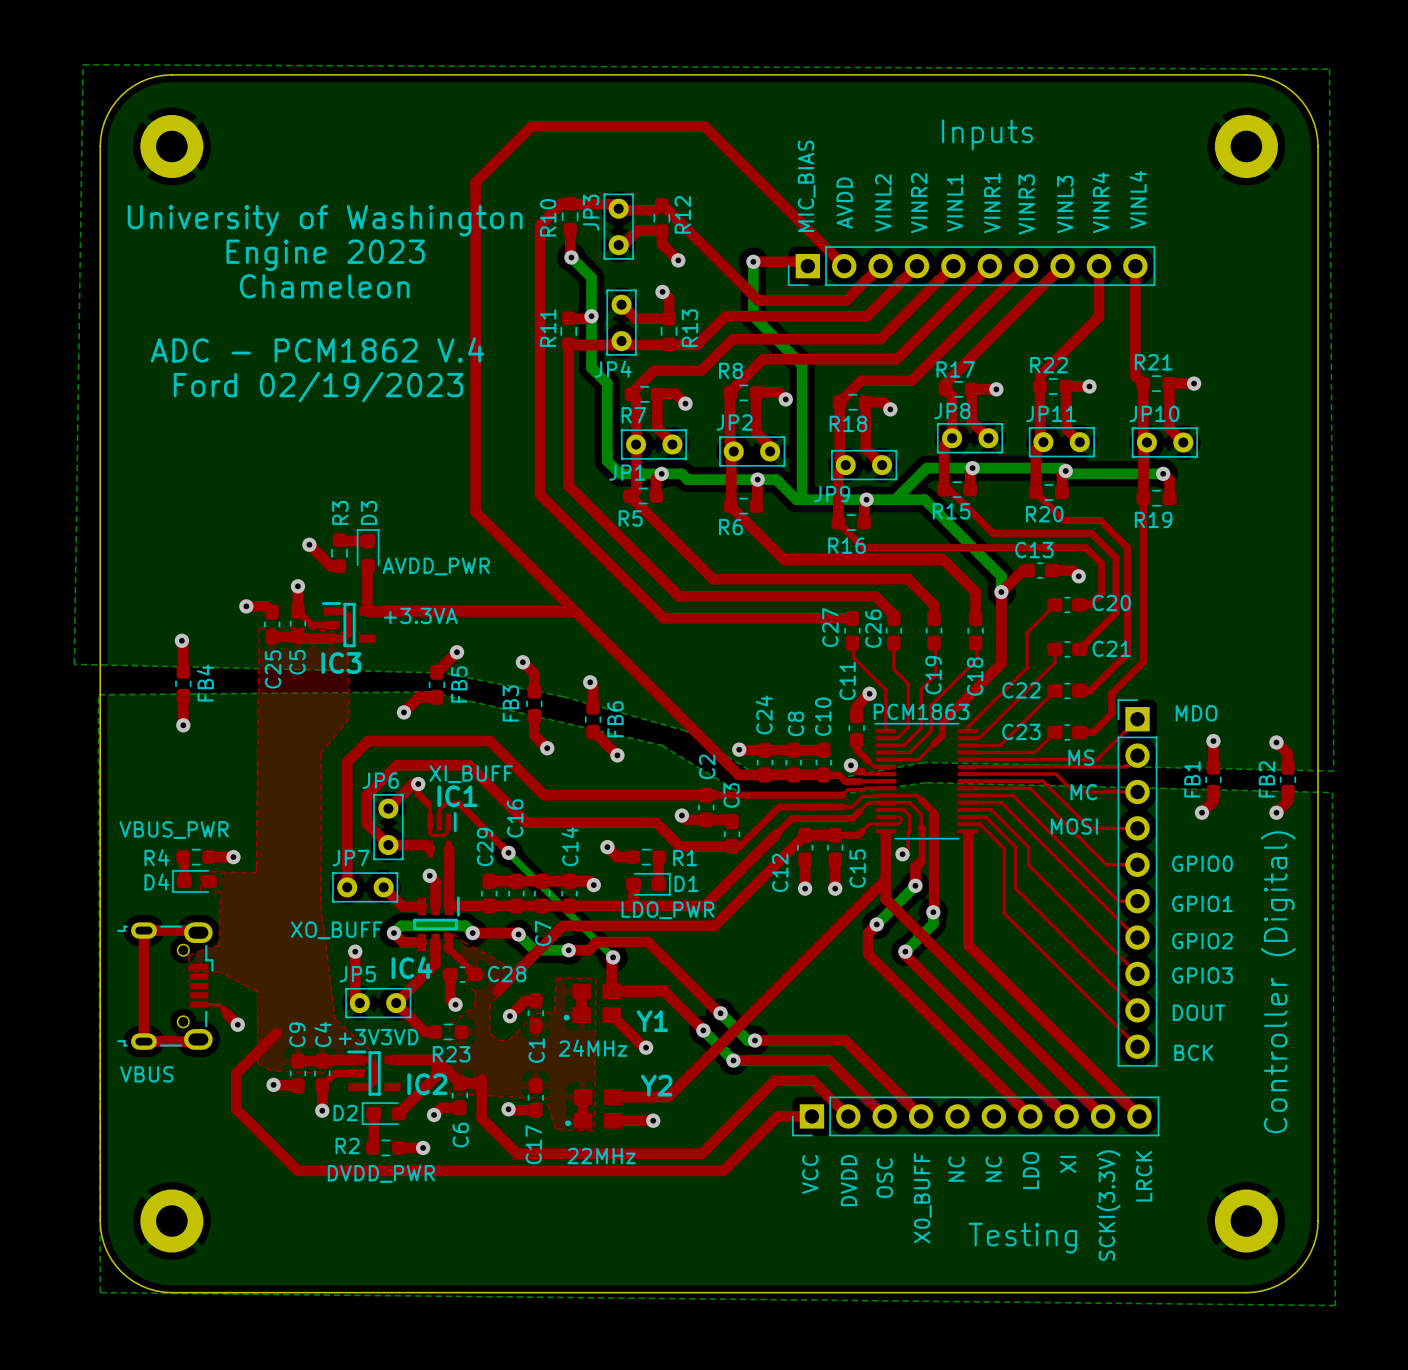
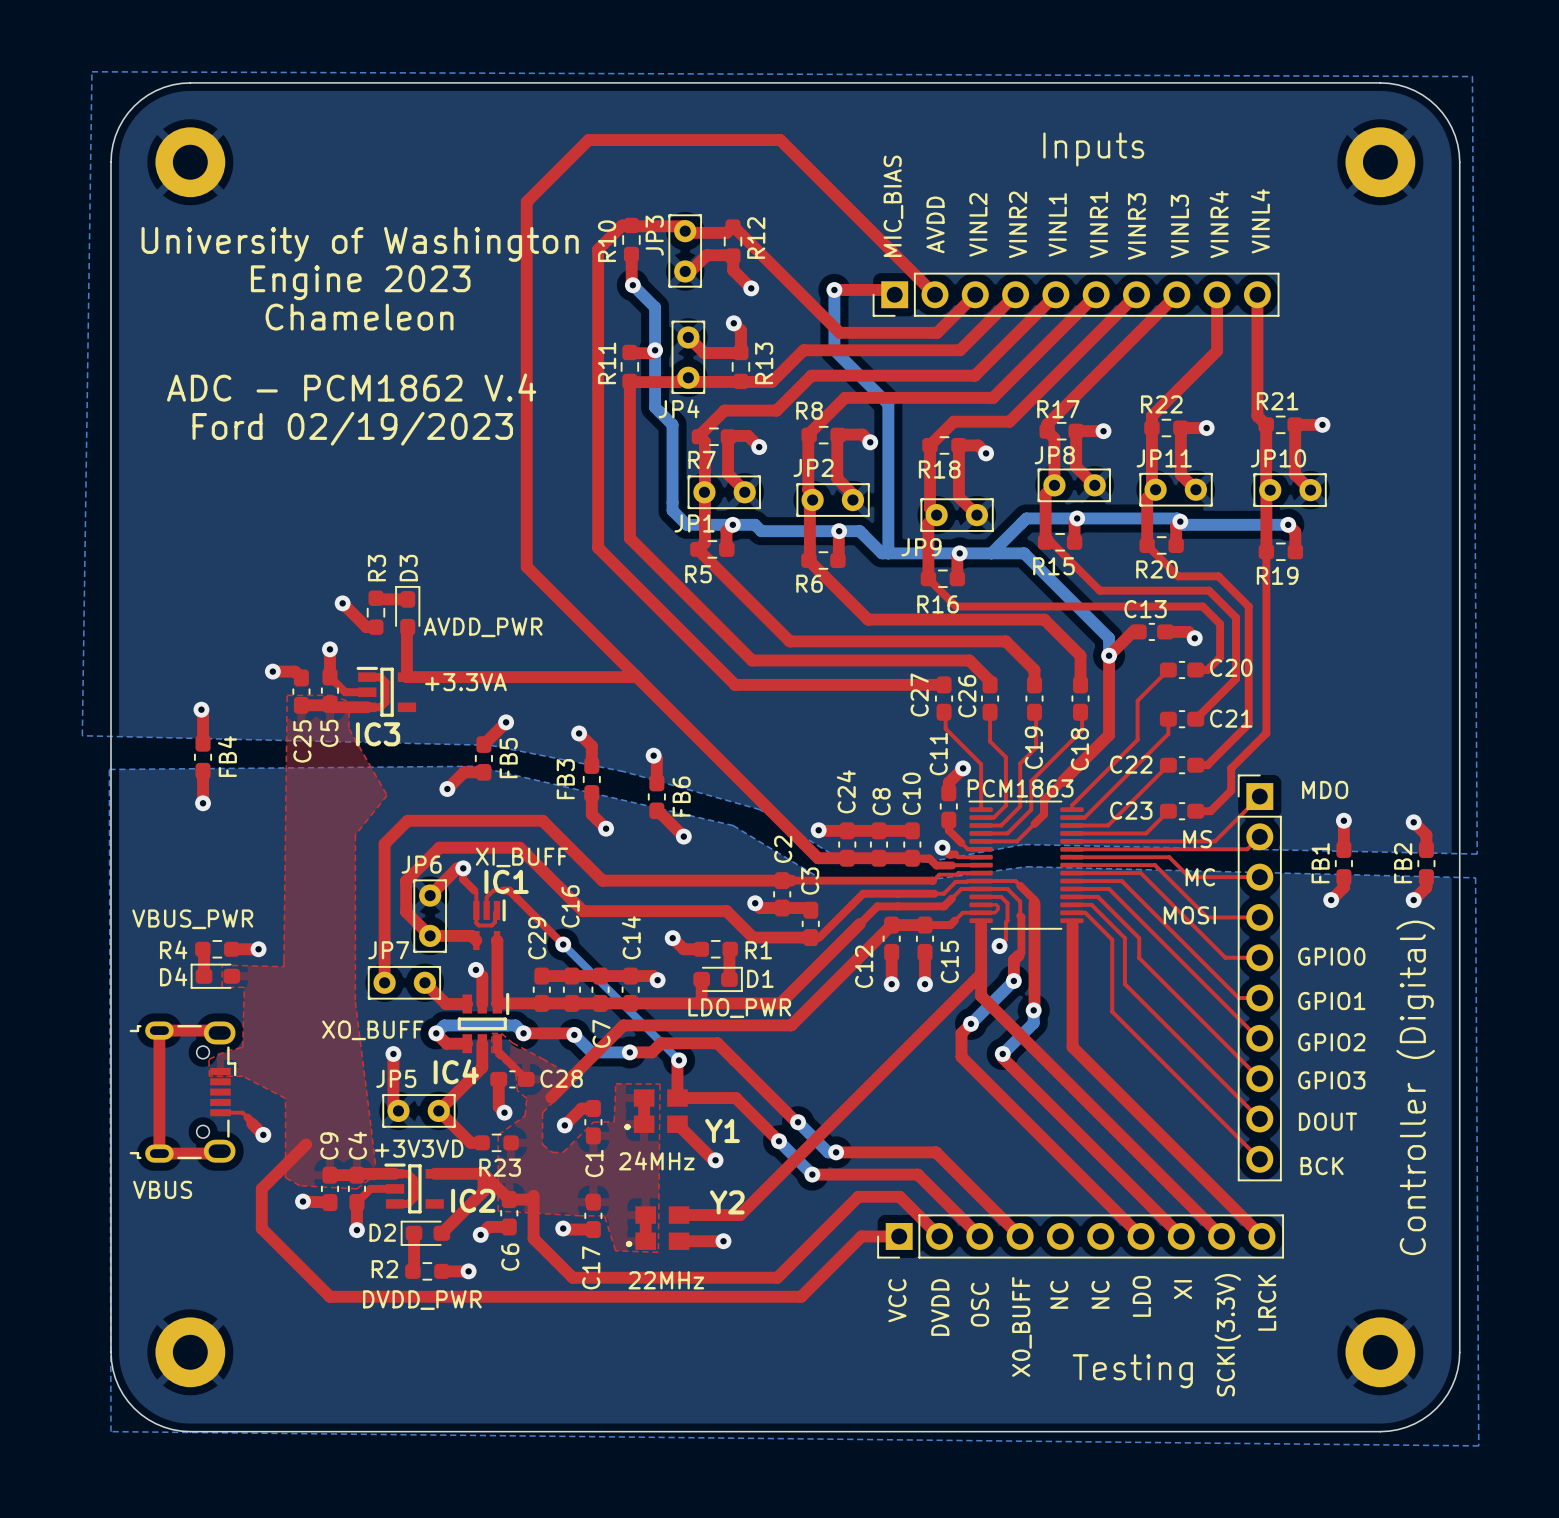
top zone outline: (299, 627) (348, 633) (349, 718) -> (331, 695) (349, 701) (349, 728) (387, 795)
top zone outline: (335, 1019) (375, 1054) (375, 1064) (339, 1064) -> (371, 1128) (375, 1179)

